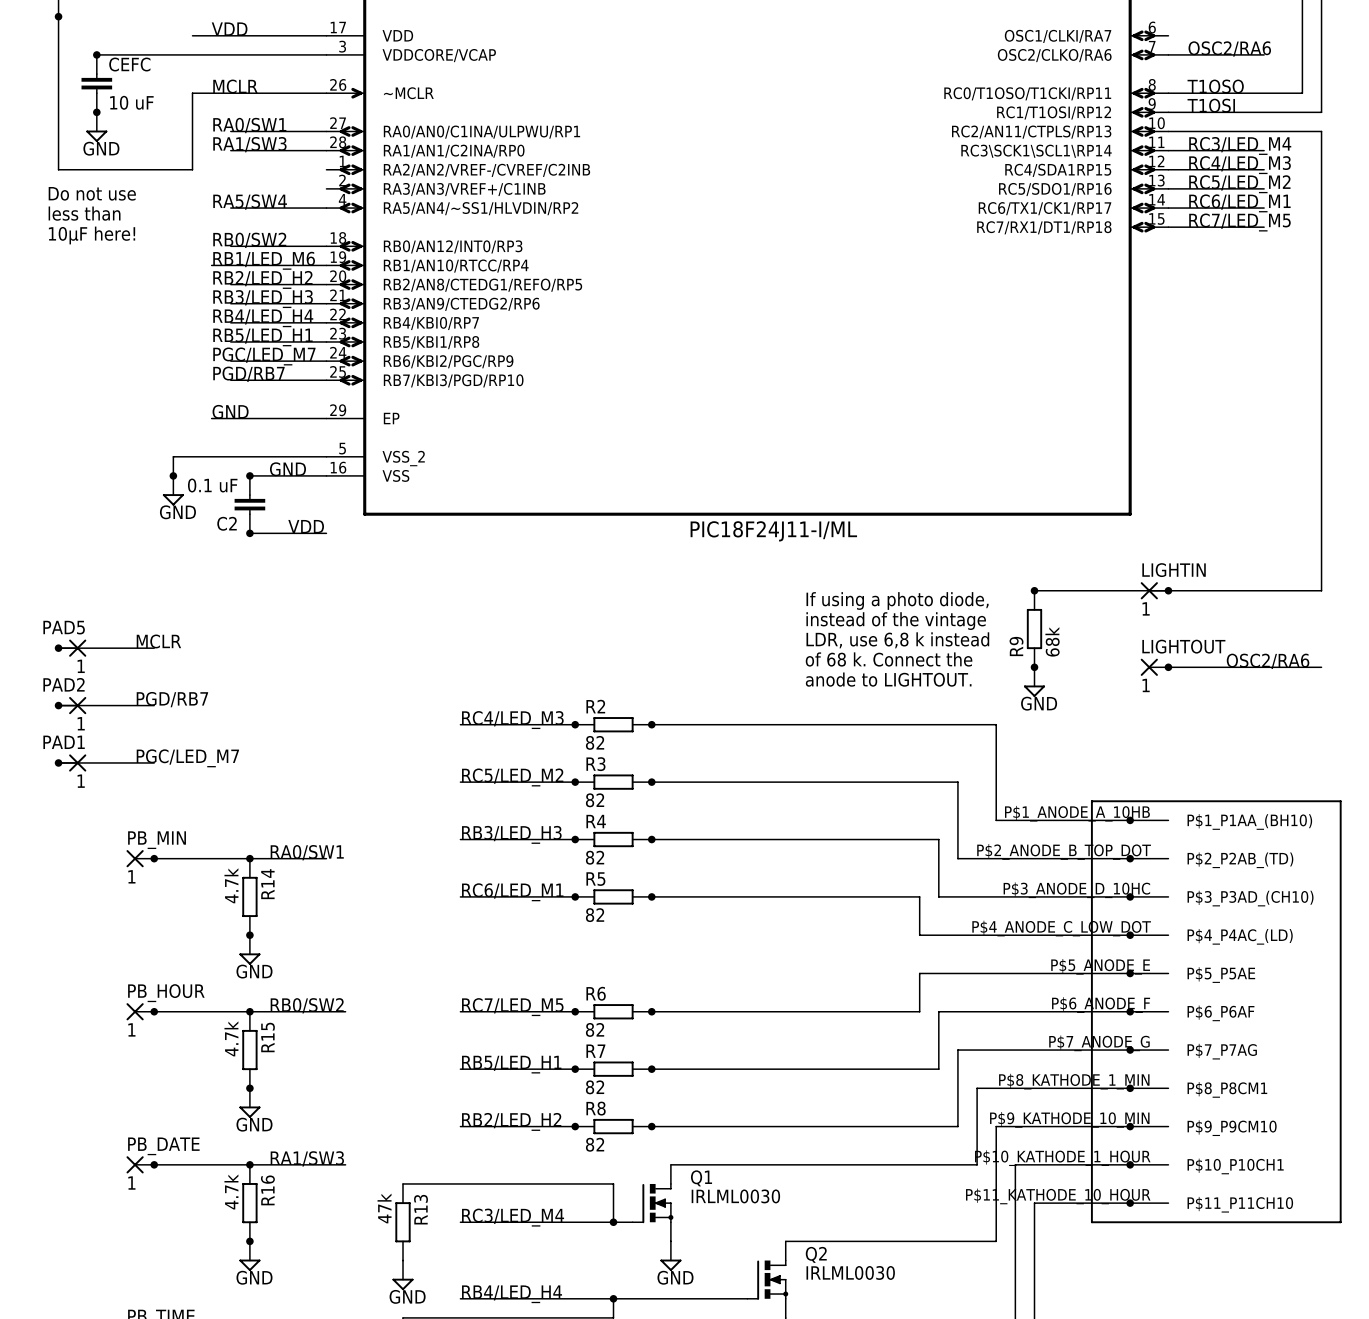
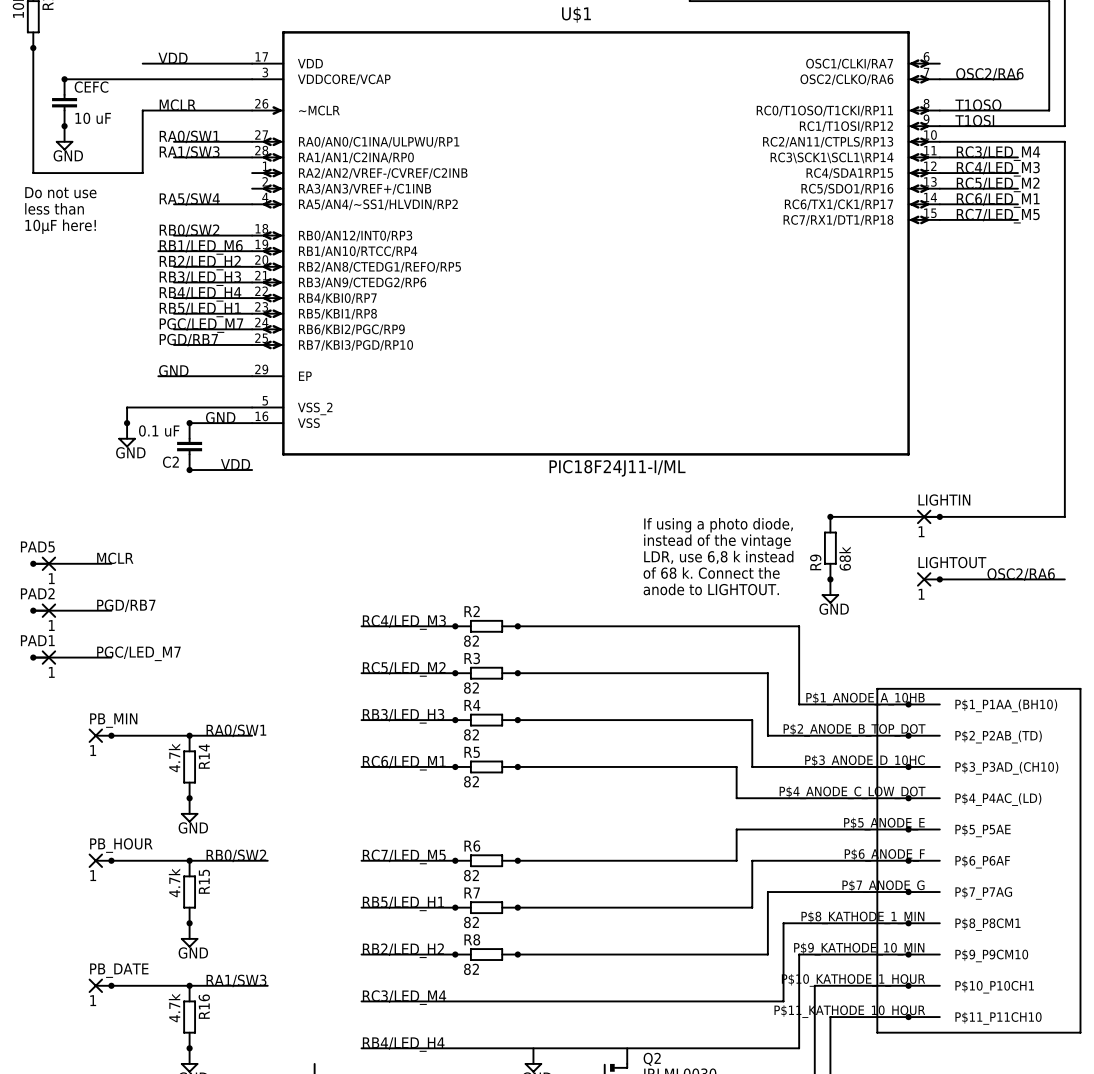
wire: (670, 1164) (977, 1164) -> (486, 1001) (783, 1001) (783, 985)
wire: (403, 1183) (460, 1183) -> none
wire: (613, 1183) (613, 1222) -> none
Q1: IRLML0030 (652, 1203) -> none
label position: RC3/LED_M4 (513, 1217) -> RC3/LED_M4 (404, 997)
R13: 47k (403, 1222) -> none
wire: (460, 1222) (632, 1222) -> none
junction: (613, 1222) -> none
label: none -> RB4/LED_H4 (403, 1044)
wire: none -> (361, 1048) (627, 1048)

